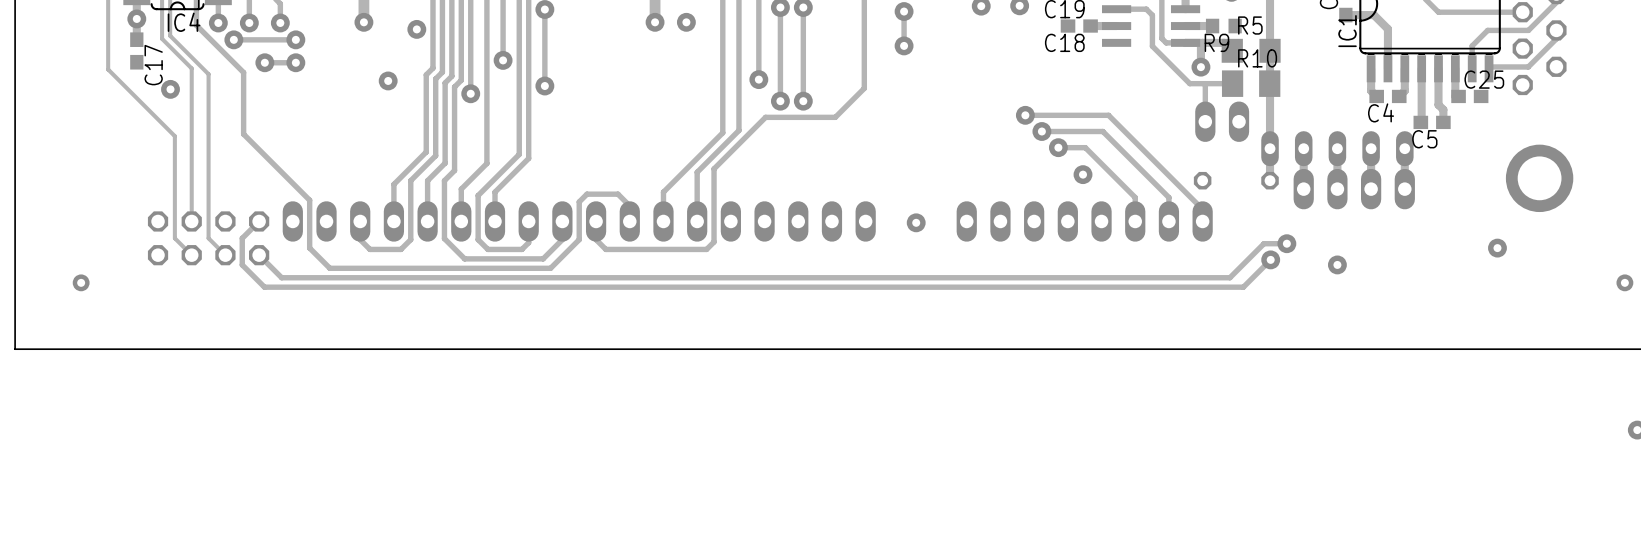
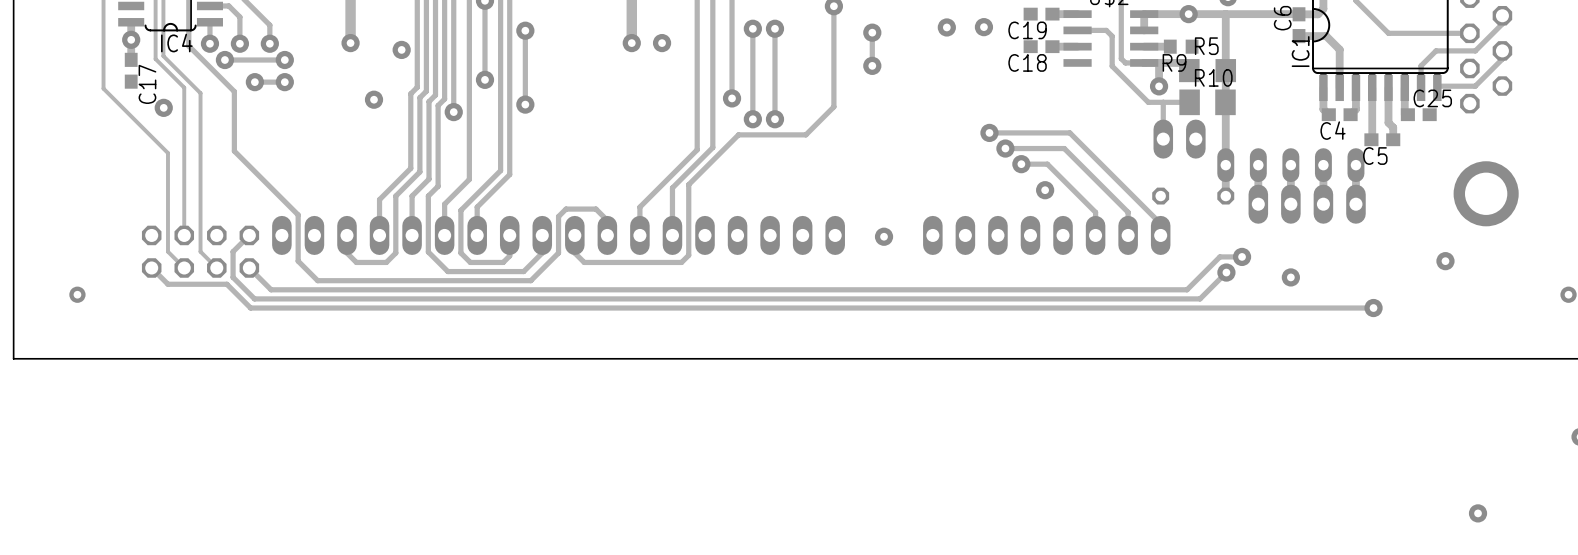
track: none -> (151, 267) (167, 284) (226, 284) (250, 308) (1373, 308)
via: none -> (1373, 308)
via: none -> (1478, 513)

